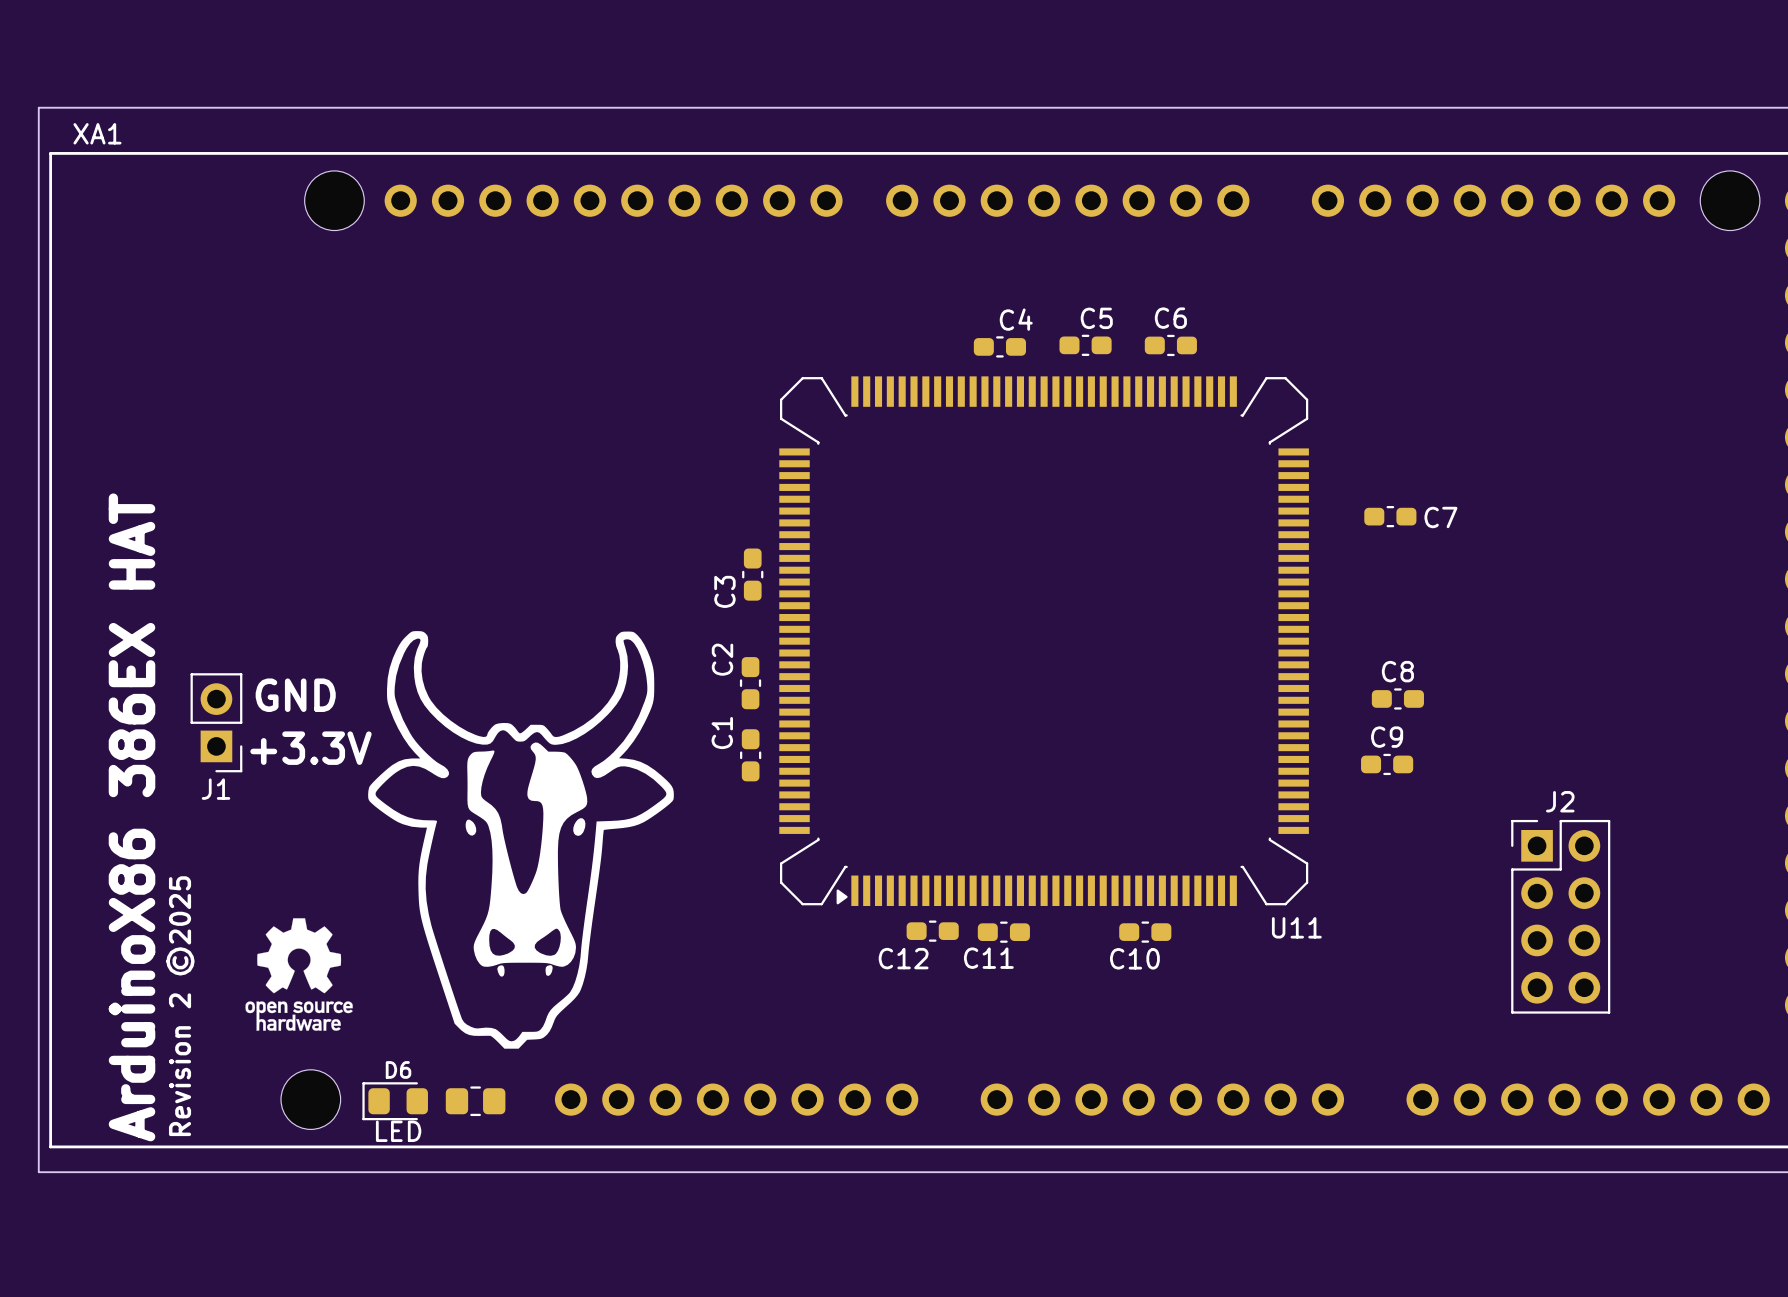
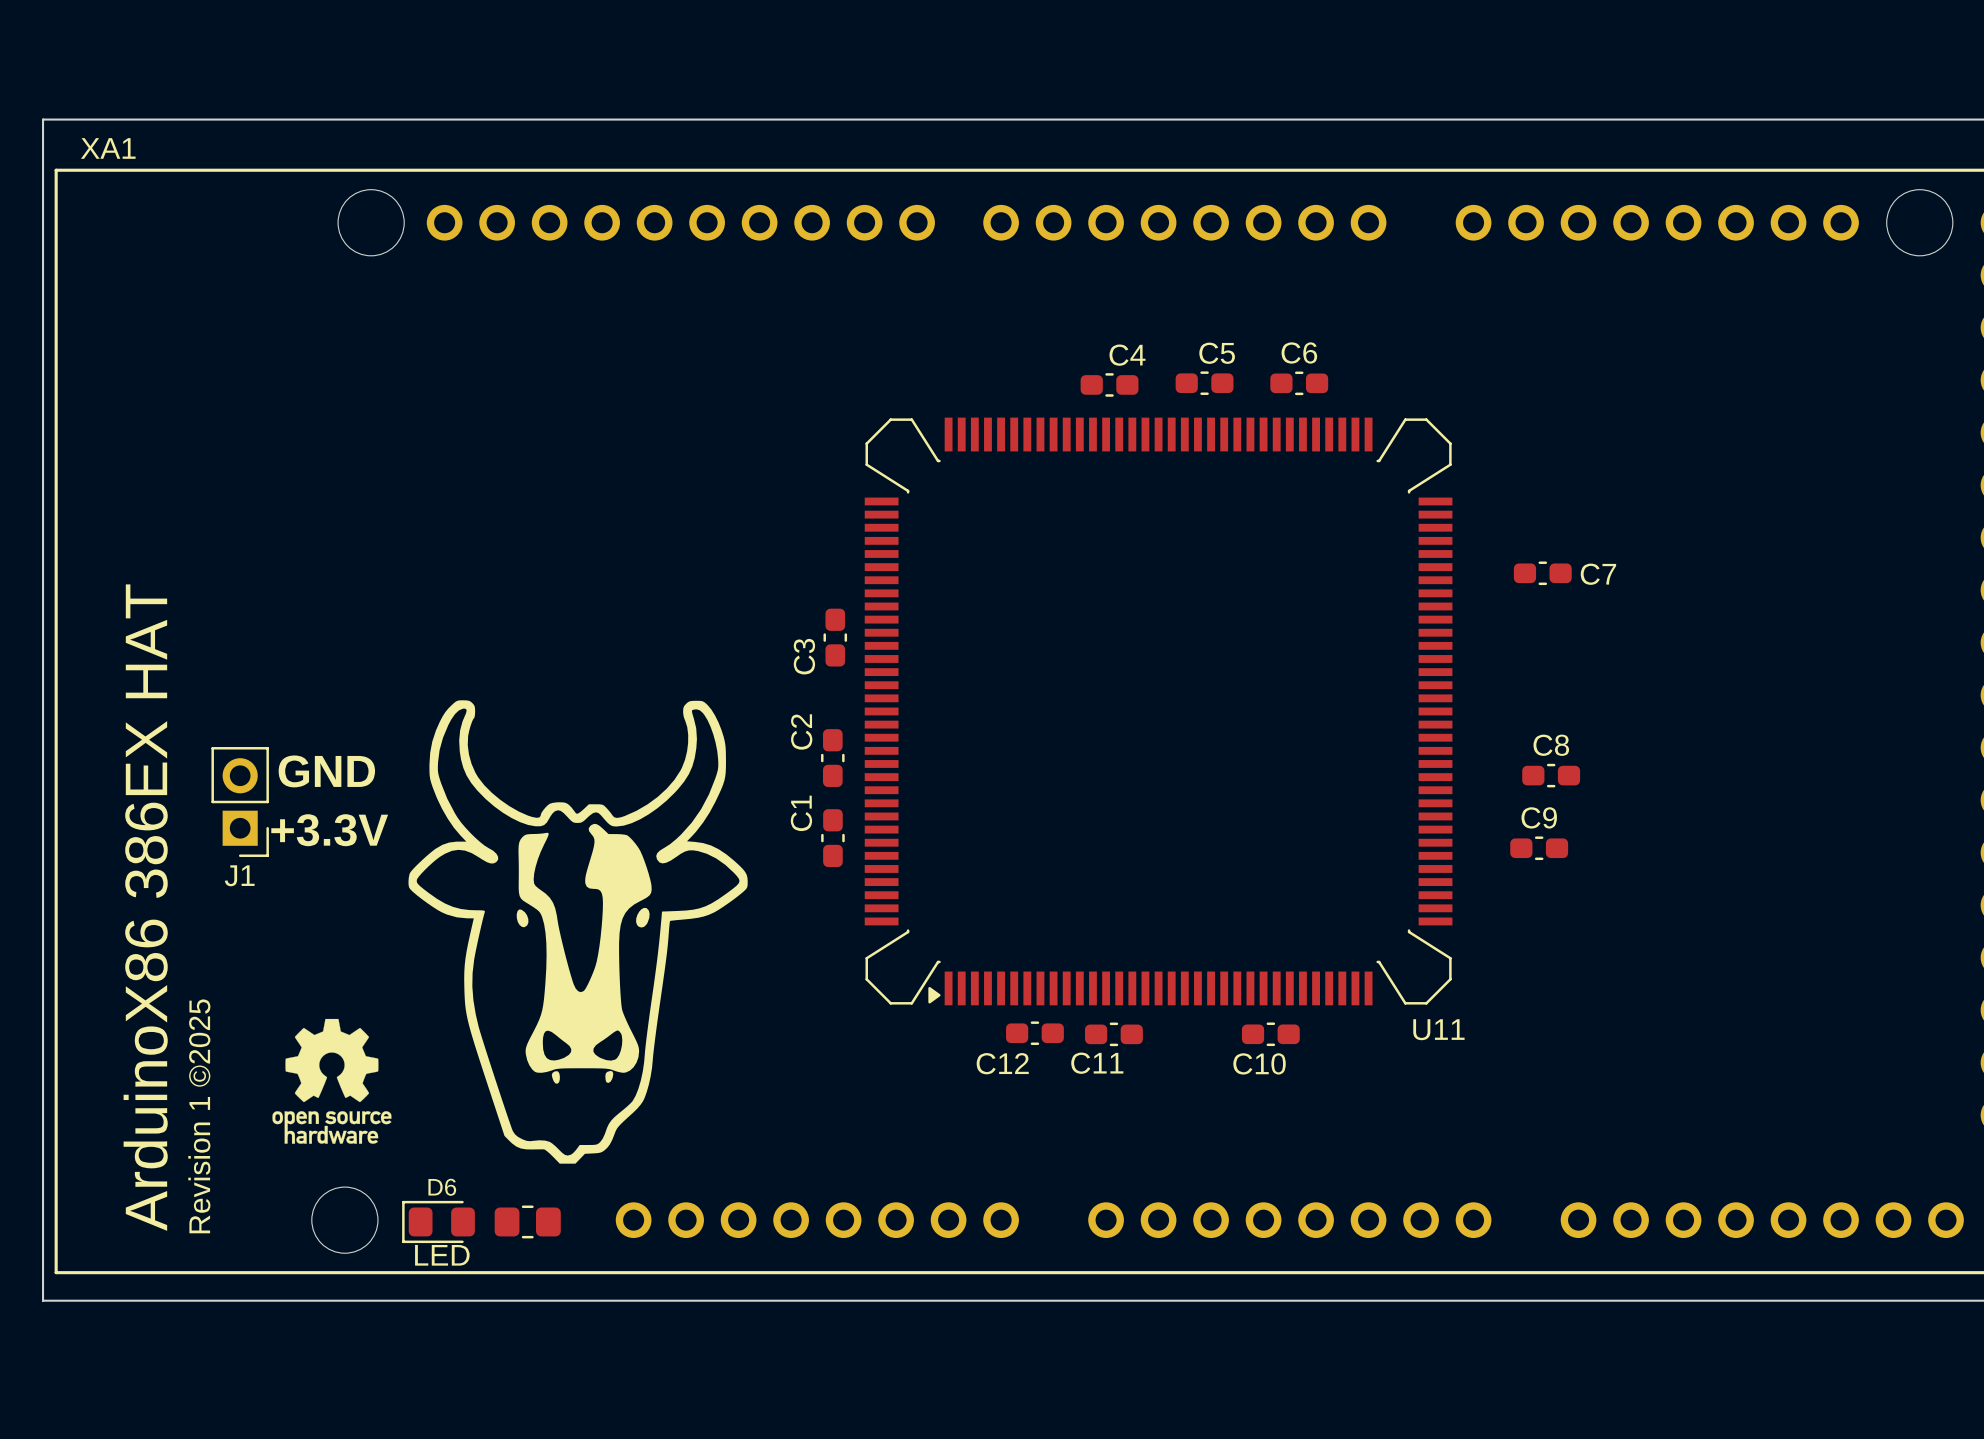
J2: (1560, 916) -> none
text: Revision 2 ©2025 (180, 1006) -> Revision 1 ©2025 (199, 1116)

